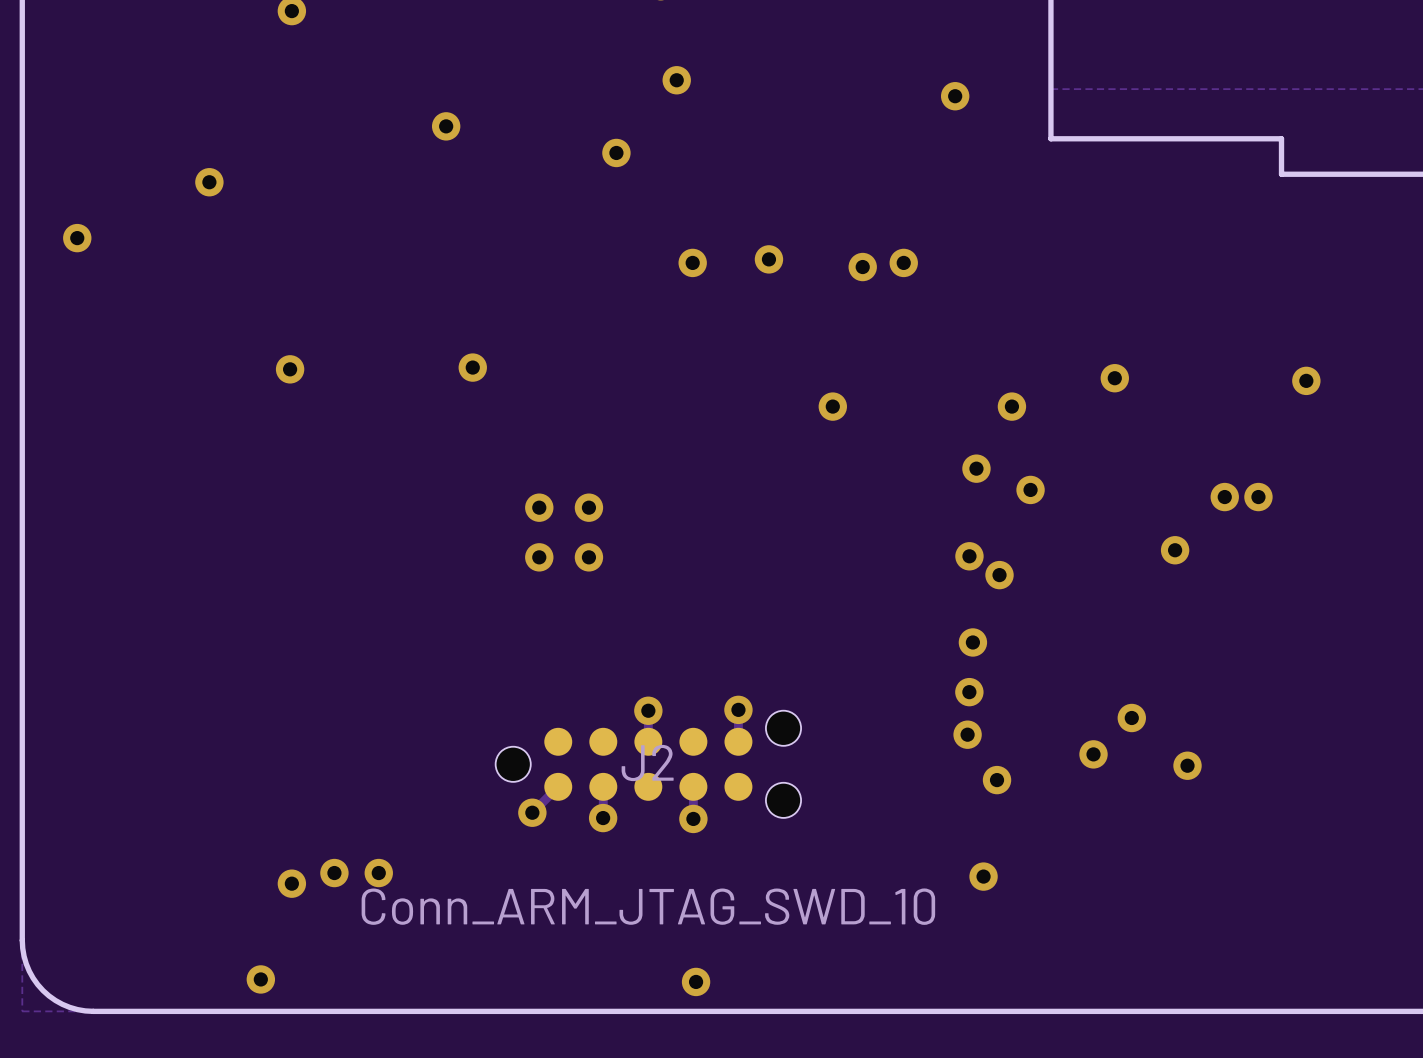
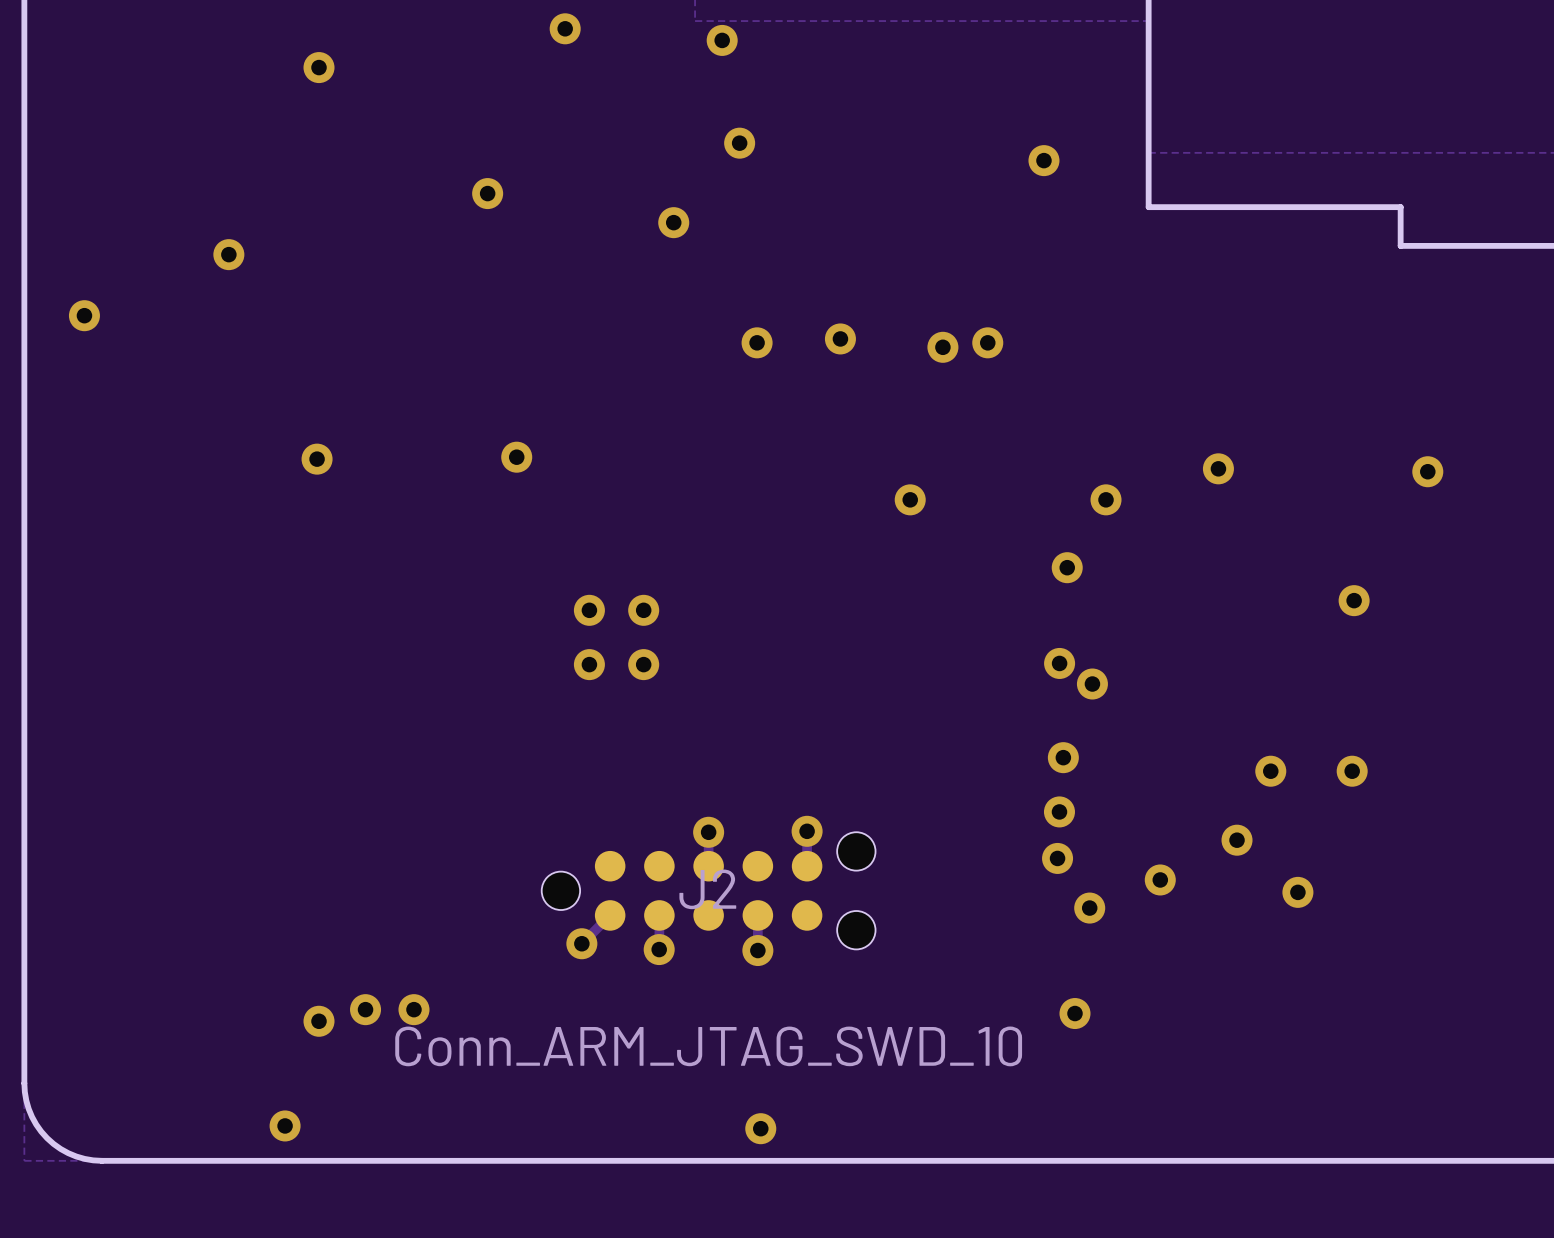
via: (1030, 489) -> none
via: (1224, 497) -> none
via: (1258, 497) -> none
via: none -> (1354, 600)
via: (1175, 550) -> none
via: none -> (1270, 771)
via: none -> (1352, 771)
via position: (1093, 754) -> (1160, 879)

